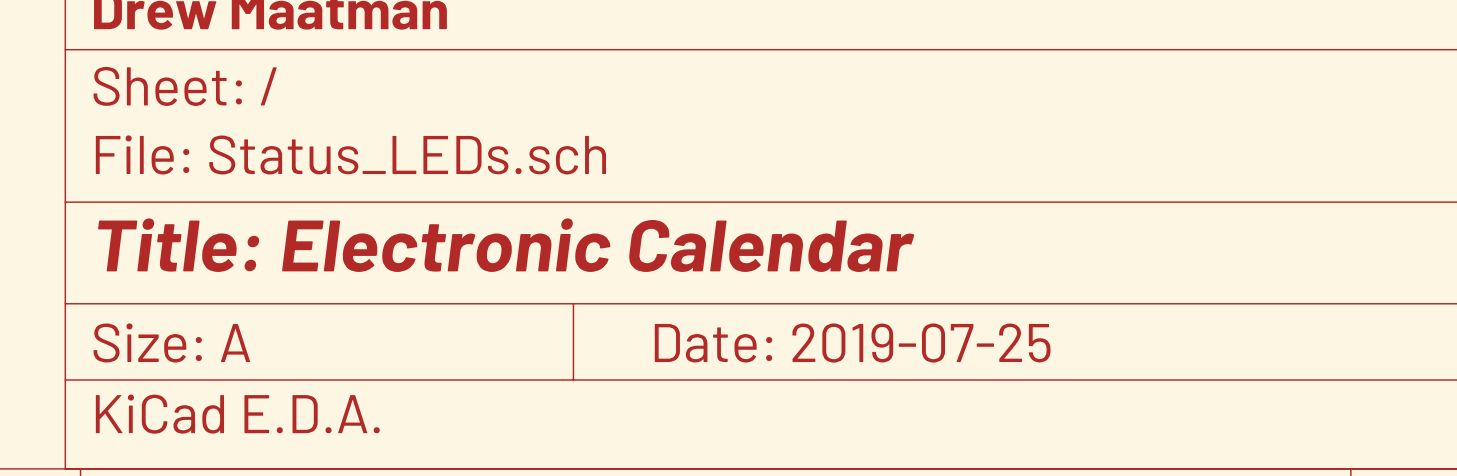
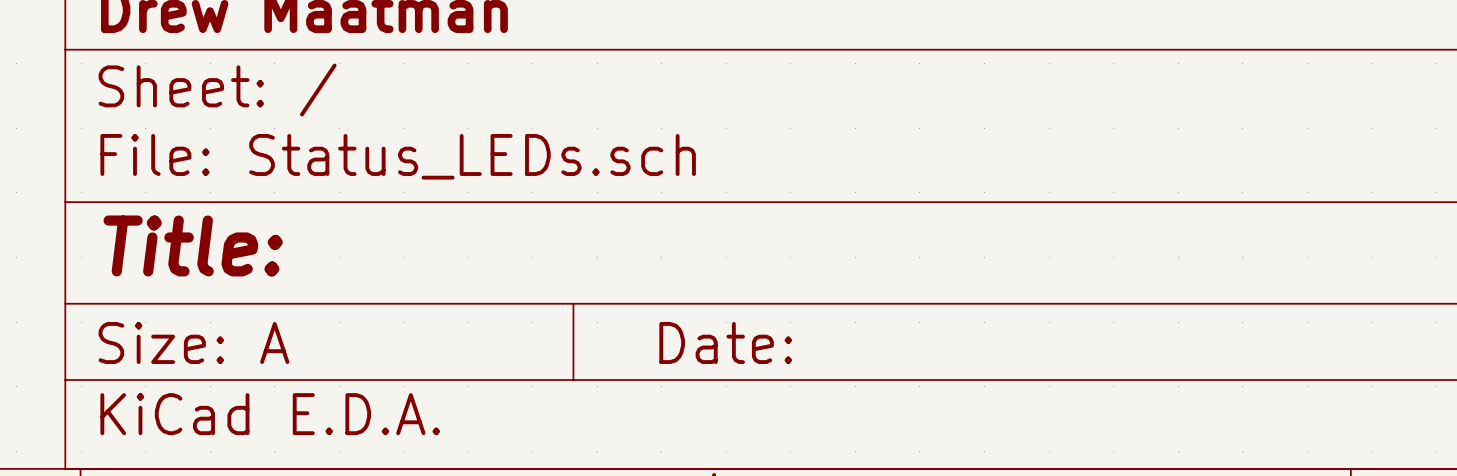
title block: Title: Electronic Calendar (506, 245) -> Title: (193, 245)
title block: Date: 2019-07-25 (852, 343) -> Date: (725, 342)

